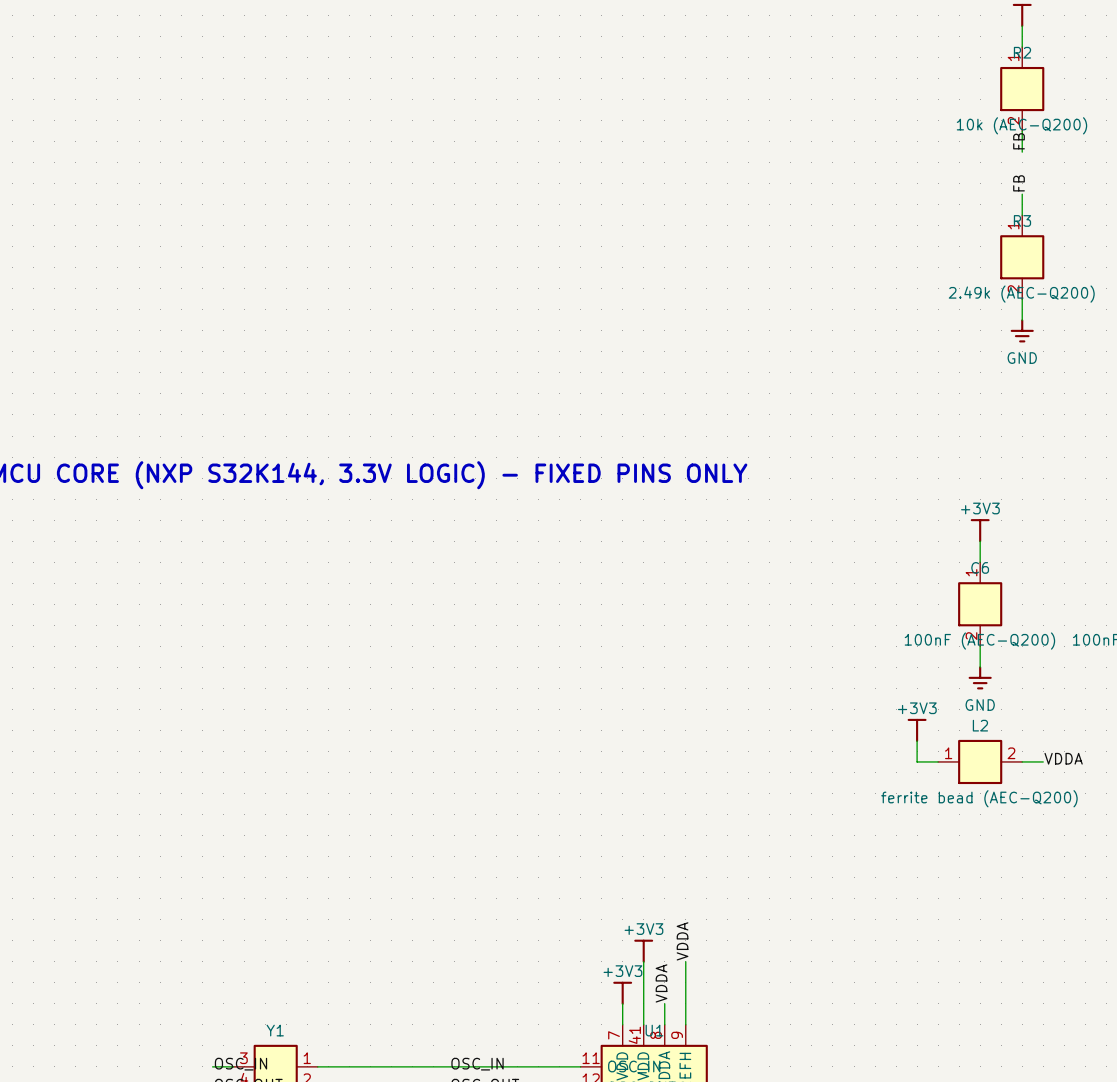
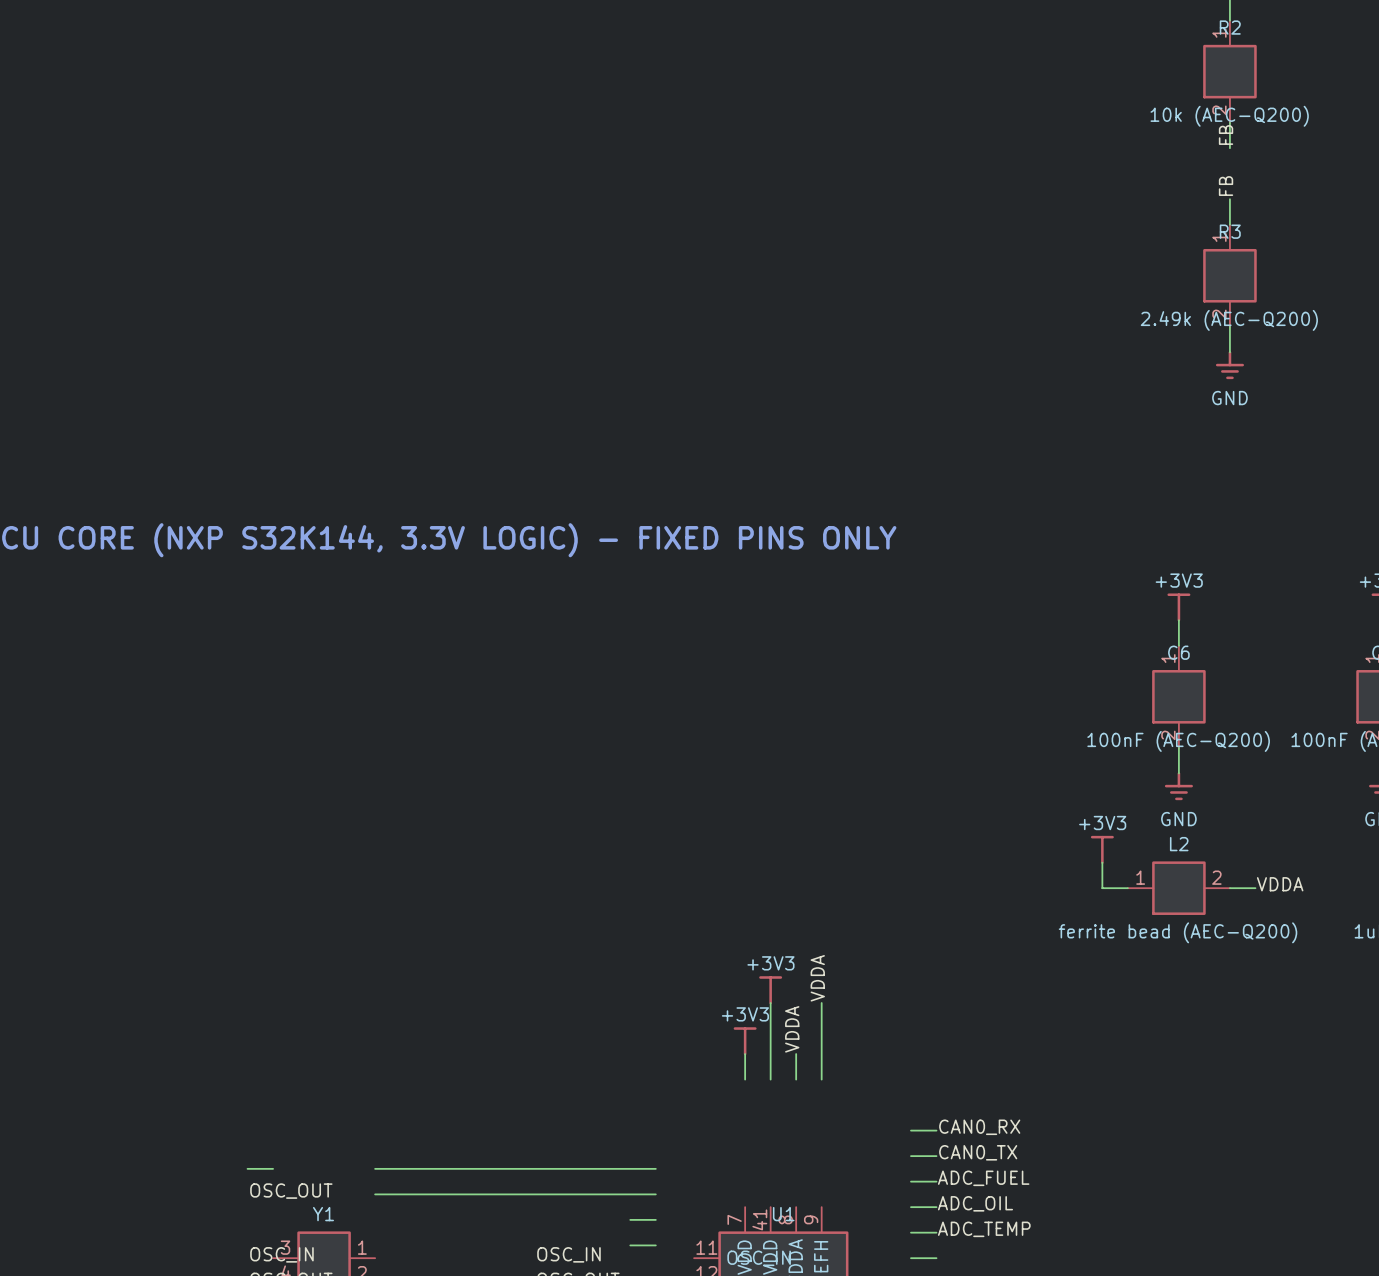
label: none -> VDDA (817, 978)
power symbol: none -> +3V3 (770, 990)
label: none -> VDDA (792, 1029)
power symbol: none -> +3V3 (745, 1041)
label: VDDA (682, 941) -> none
power symbol: +3V3 (643, 951) -> none
label: none -> CAN0_RX (979, 1127)
wire: (643, 961) (643, 1024) -> (770, 1003) (770, 1079)
wire: (685, 961) (685, 1024) -> (821, 1003) (821, 1079)
wire: none -> (910, 1130) (936, 1130)
label: none -> CAN0_TX (978, 1152)
wire: none -> (910, 1156) (936, 1156)
label: VDDA (661, 983) -> none
wire: none -> (375, 1168) (655, 1168)
power symbol: +3V3 (622, 993) -> none
label: none -> ADC_FUEL (983, 1178)
wire: (622, 1003) (622, 1024) -> (745, 1054) (745, 1079)
wire: (664, 1003) (664, 1024) -> (796, 1054) (796, 1079)
wire: none -> (910, 1181) (936, 1181)
label: none -> OSC_OUT (291, 1191)
wire: none -> (375, 1194) (655, 1194)
label: none -> ADC_OIL (975, 1203)
wire: none -> (910, 1207) (936, 1207)
wire: none -> (630, 1219) (655, 1219)
label: none -> ADC_TEMP (984, 1229)
wire: none -> (910, 1232) (936, 1232)
wire: none -> (630, 1245) (655, 1245)
wire: (212, 1066) (233, 1066) -> (247, 1168) (273, 1168)
wire: (317, 1066) (580, 1066) -> none
wire: none -> (910, 1258) (936, 1258)

